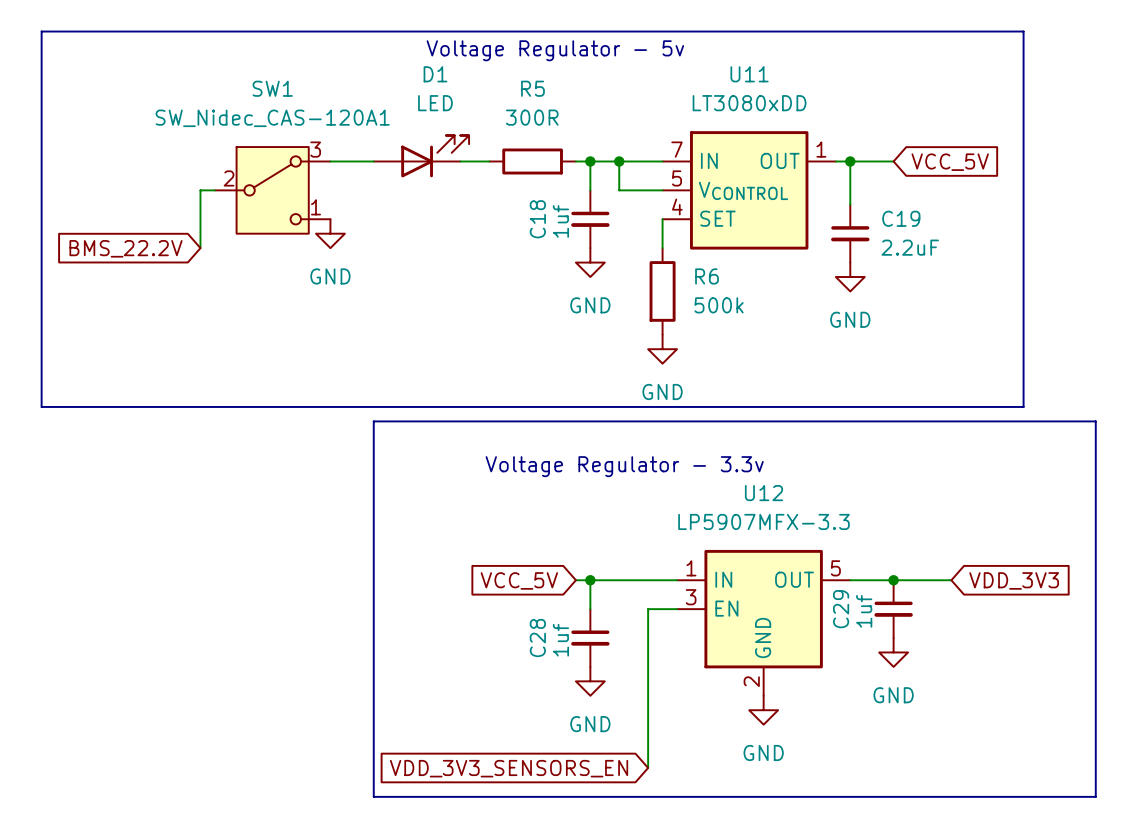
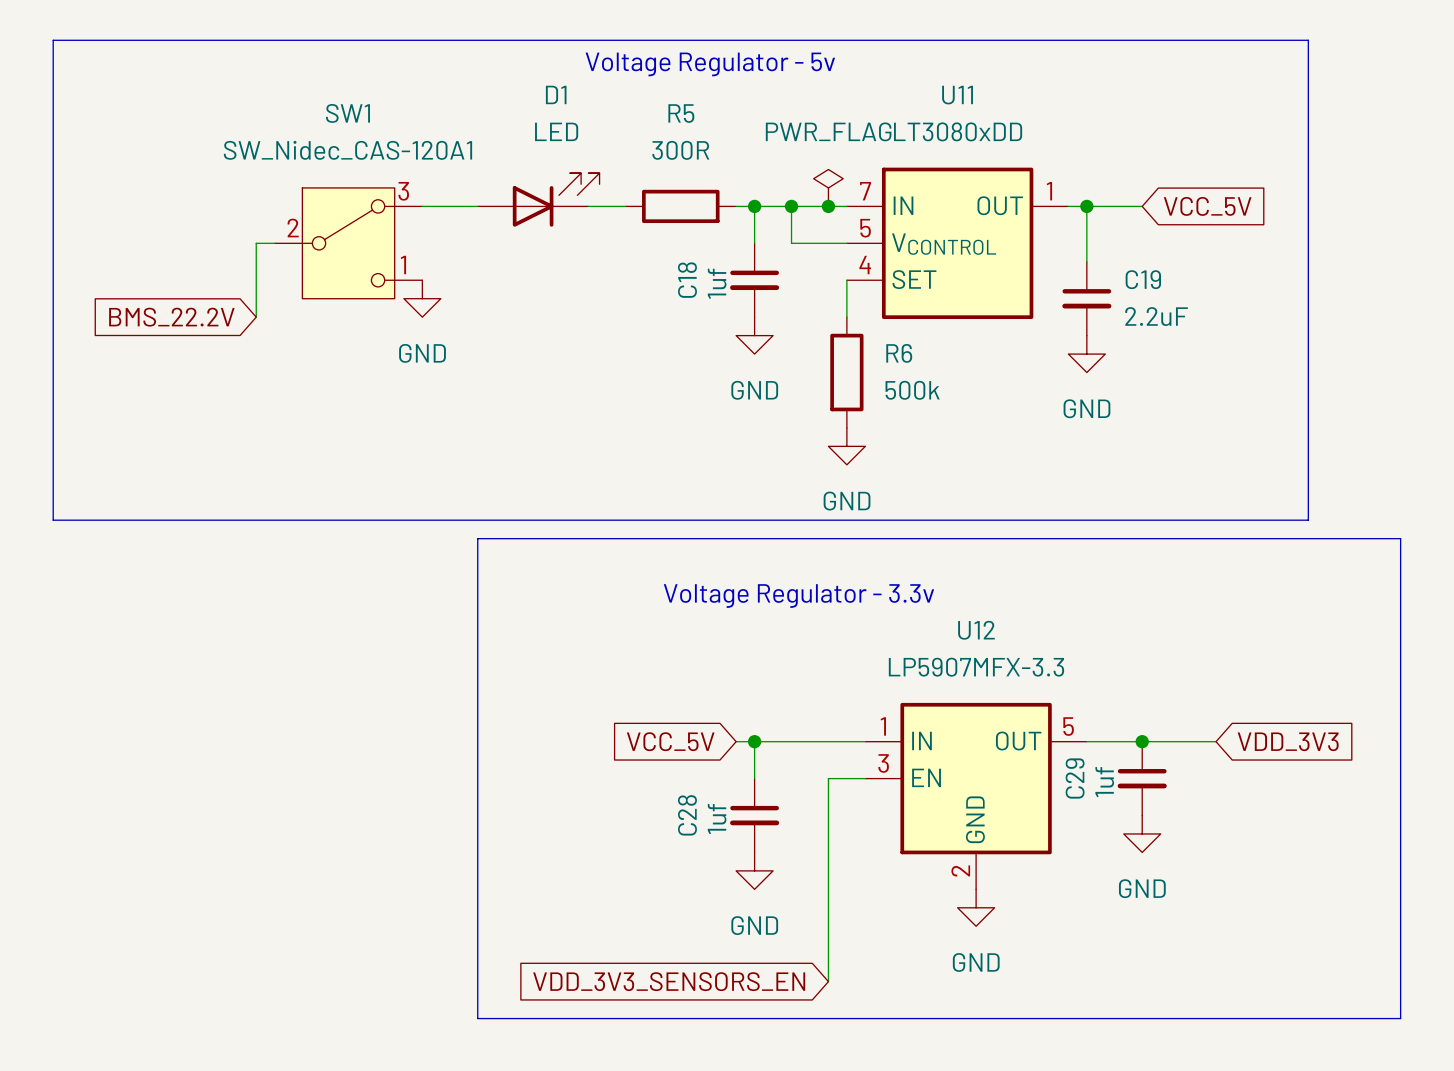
power symbol: none -> PWR_FLAG (828, 187)
junction: none -> (828, 206)

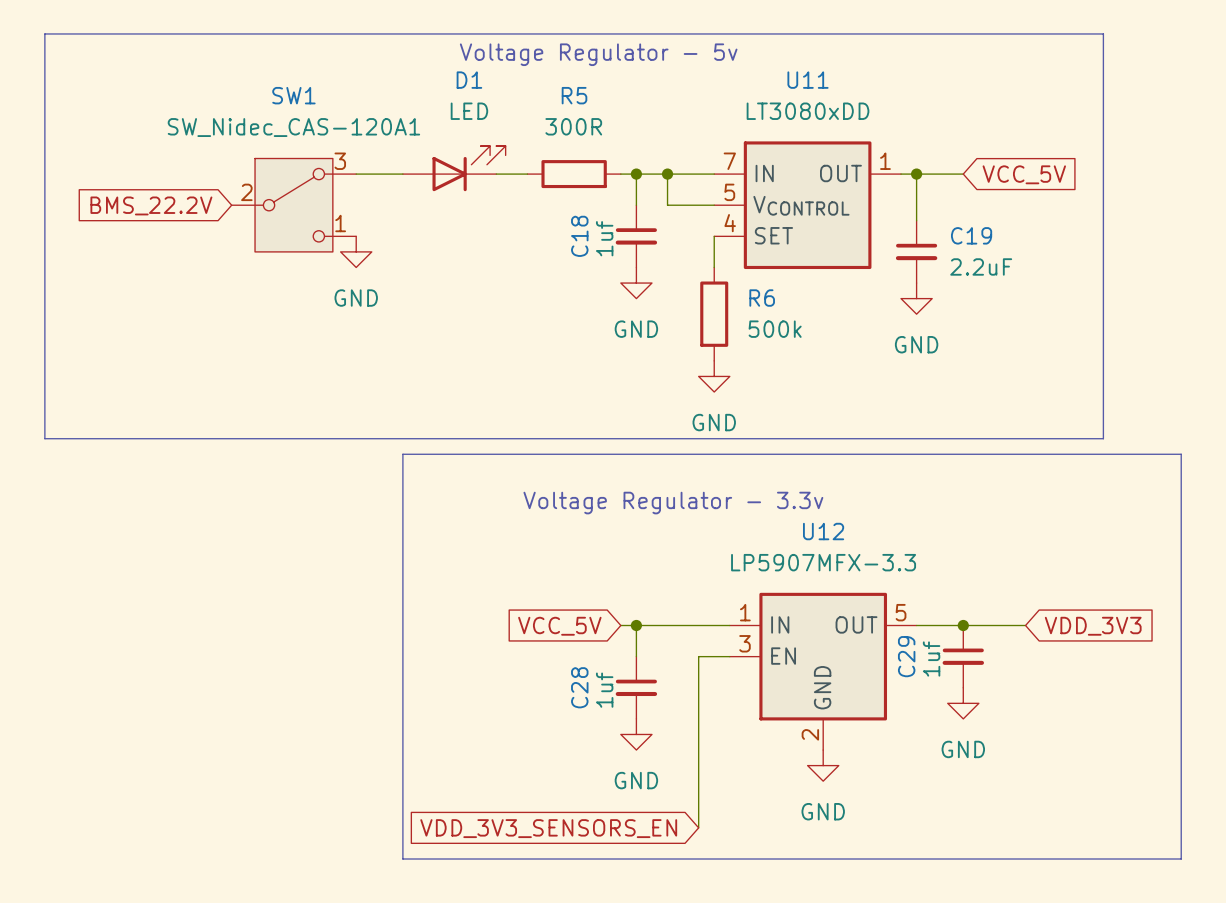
power symbol: PWR_FLAG (828, 187) -> none
junction: (828, 206) -> none
wire: (274, 243) (256, 243) (256, 317) -> none
global label position: BMS_22.2V (171, 317) -> BMS_22.2V (151, 205)

